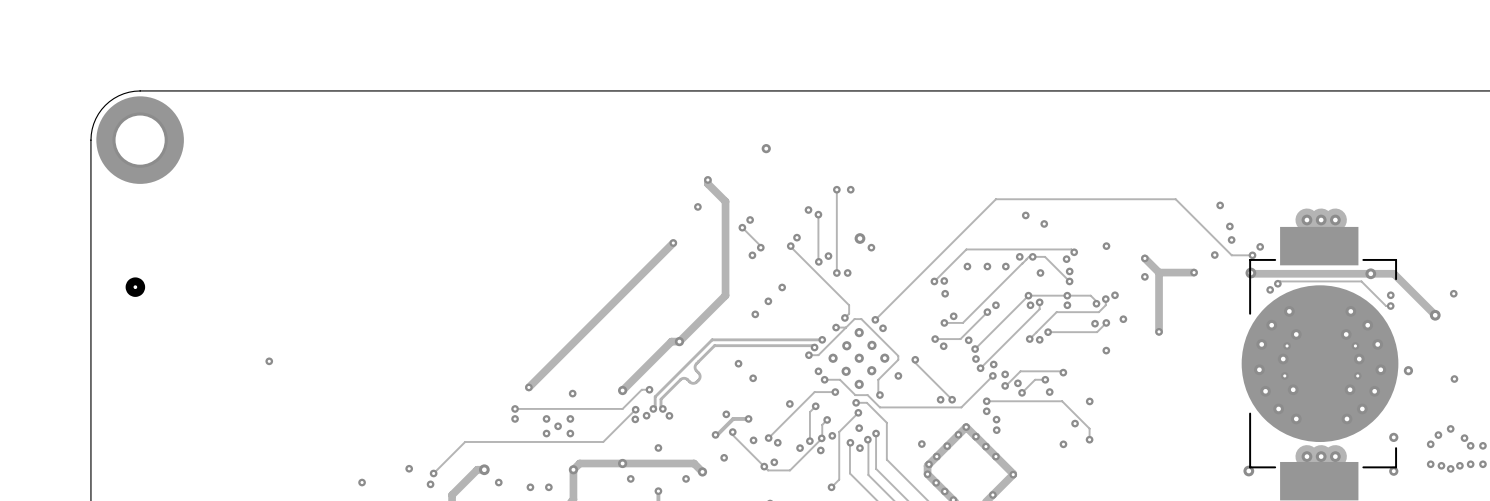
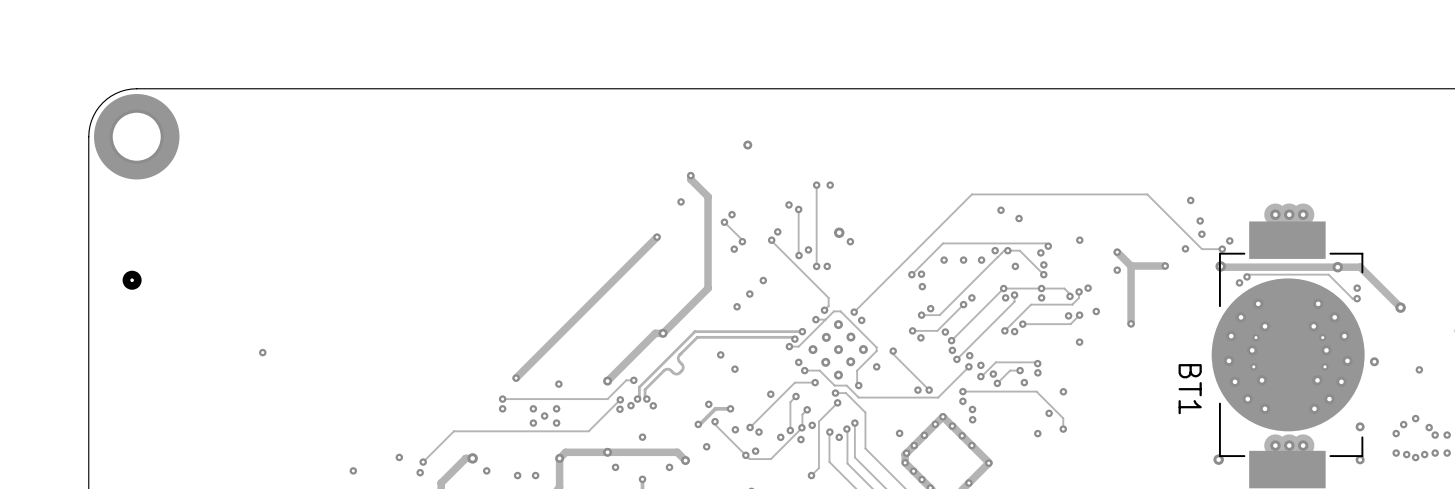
via: (1453, 293) -> none
via: none -> (1037, 372)
BT1 name: none -> BT1 (1190, 389)
via: (859, 428) -> none

